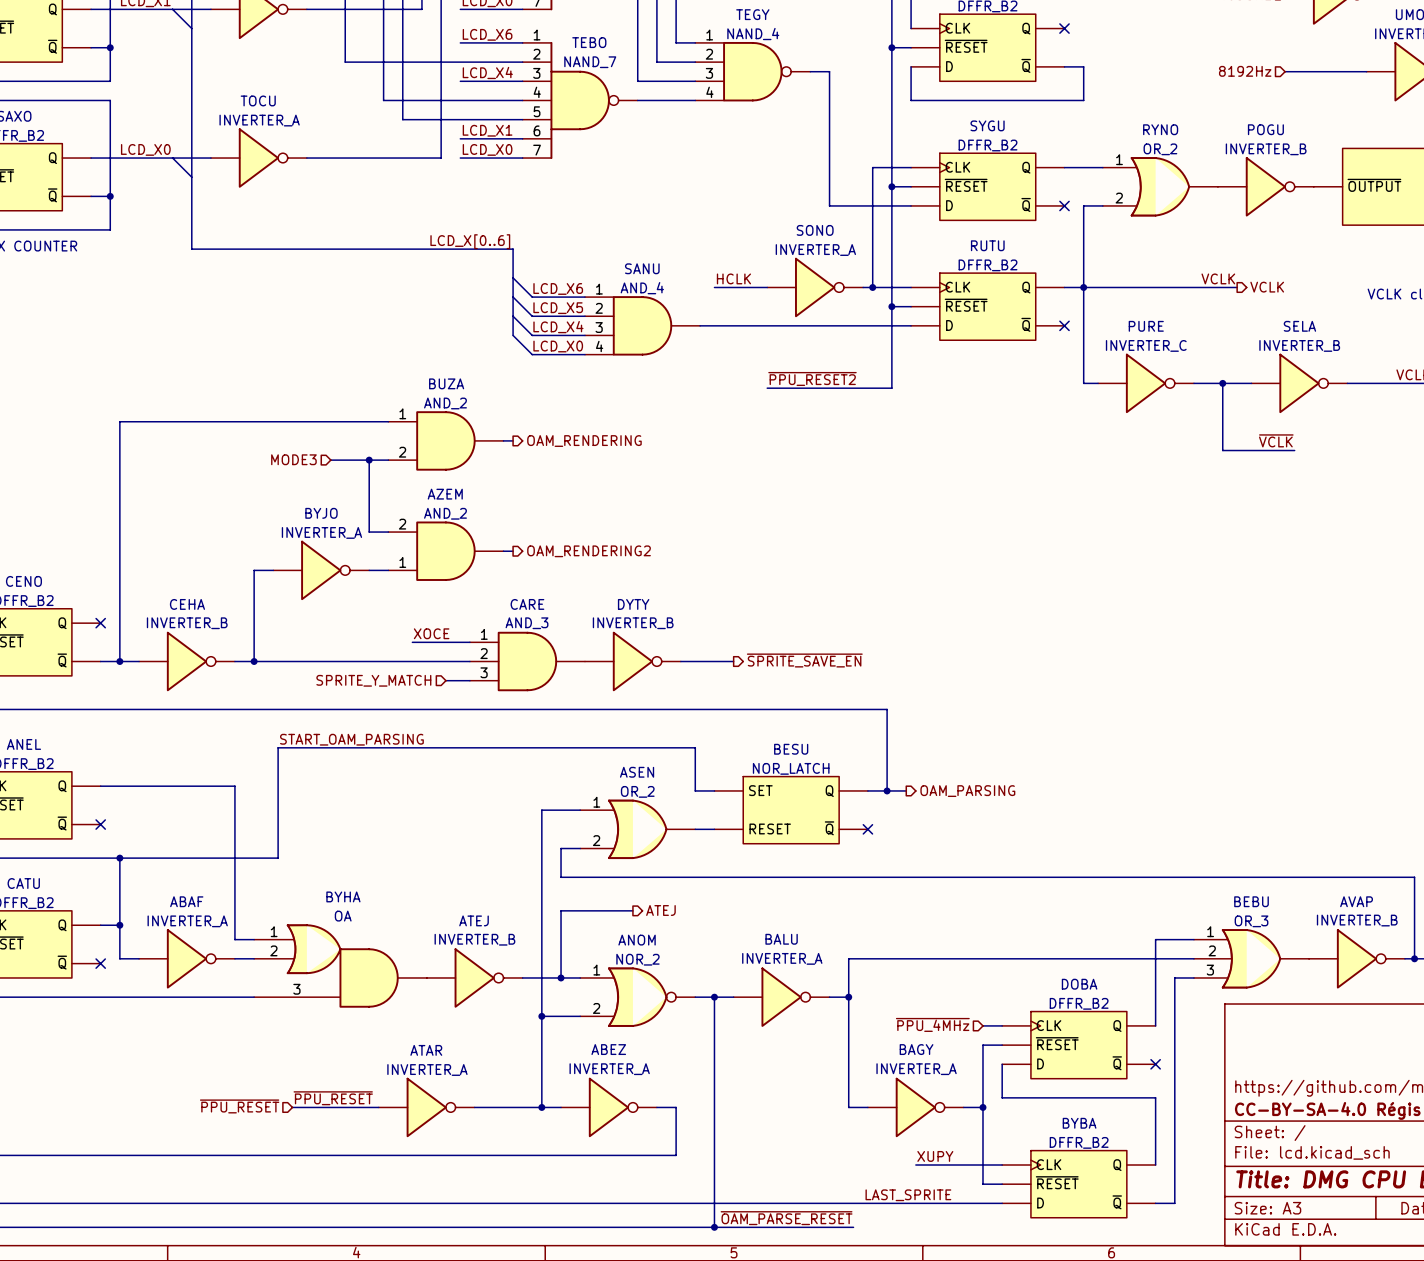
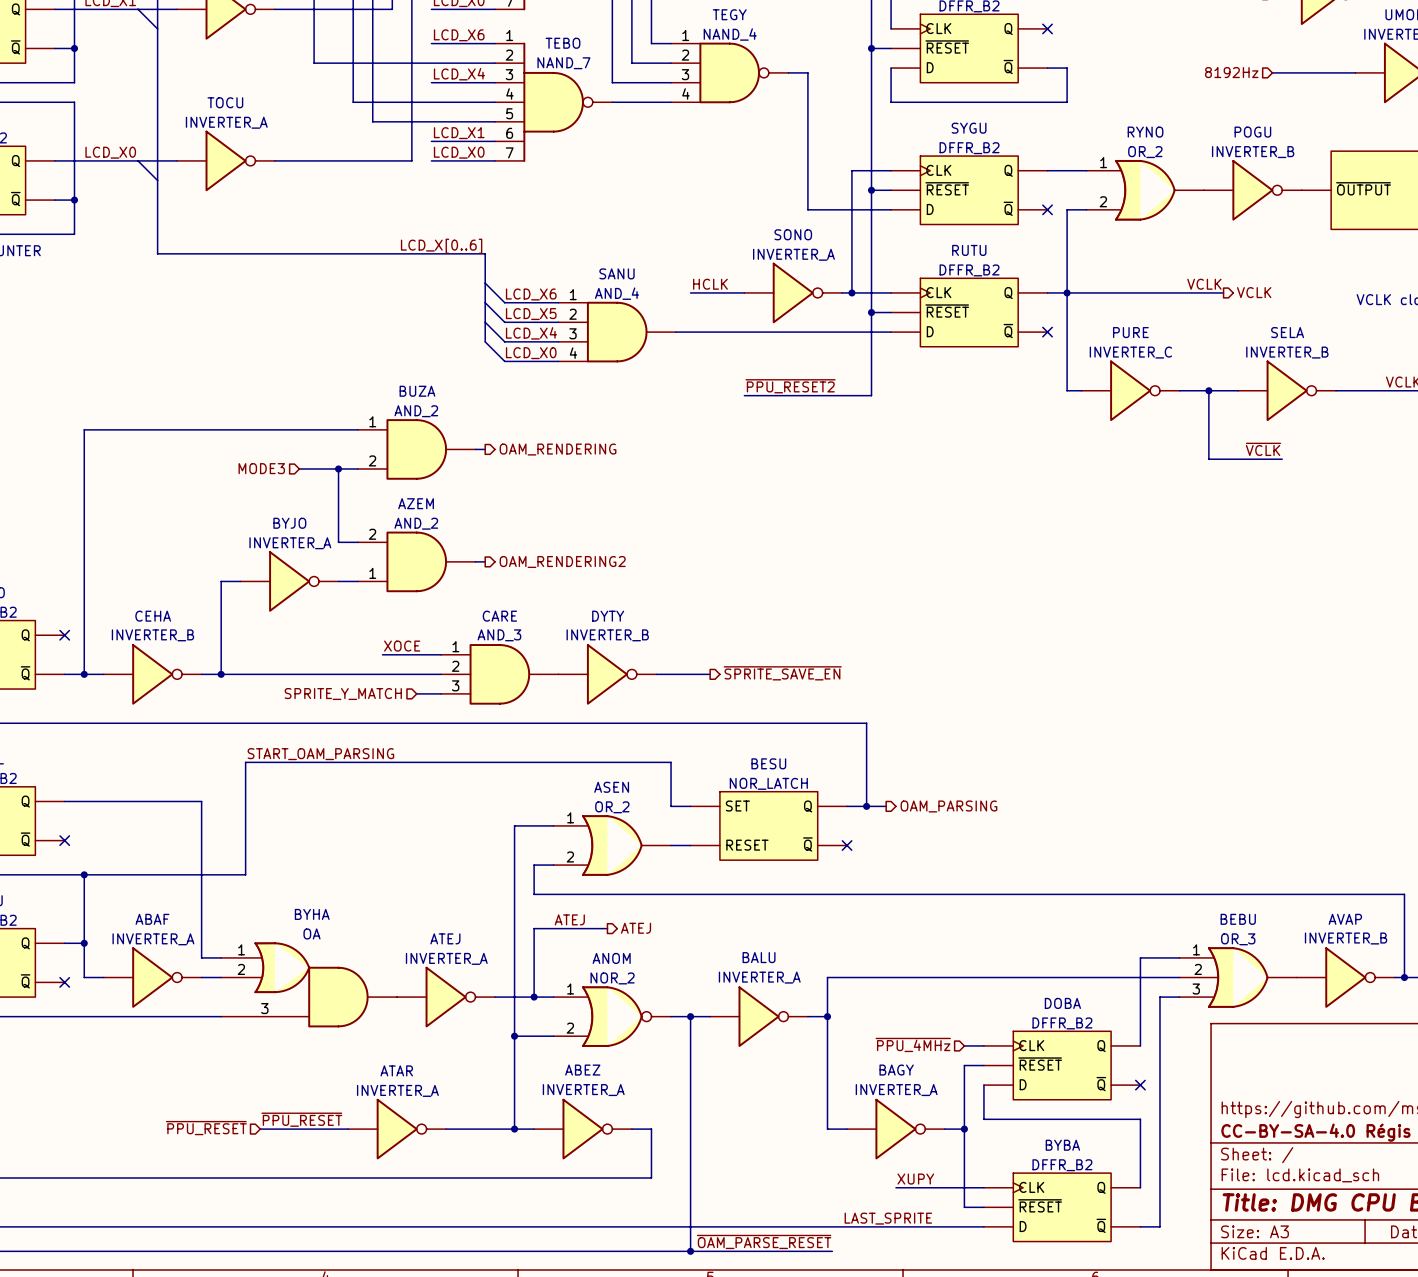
label: none -> ATEJ (569, 919)
ATEJ value: INVERTER_B (474, 939) -> INVERTER_A (446, 958)

